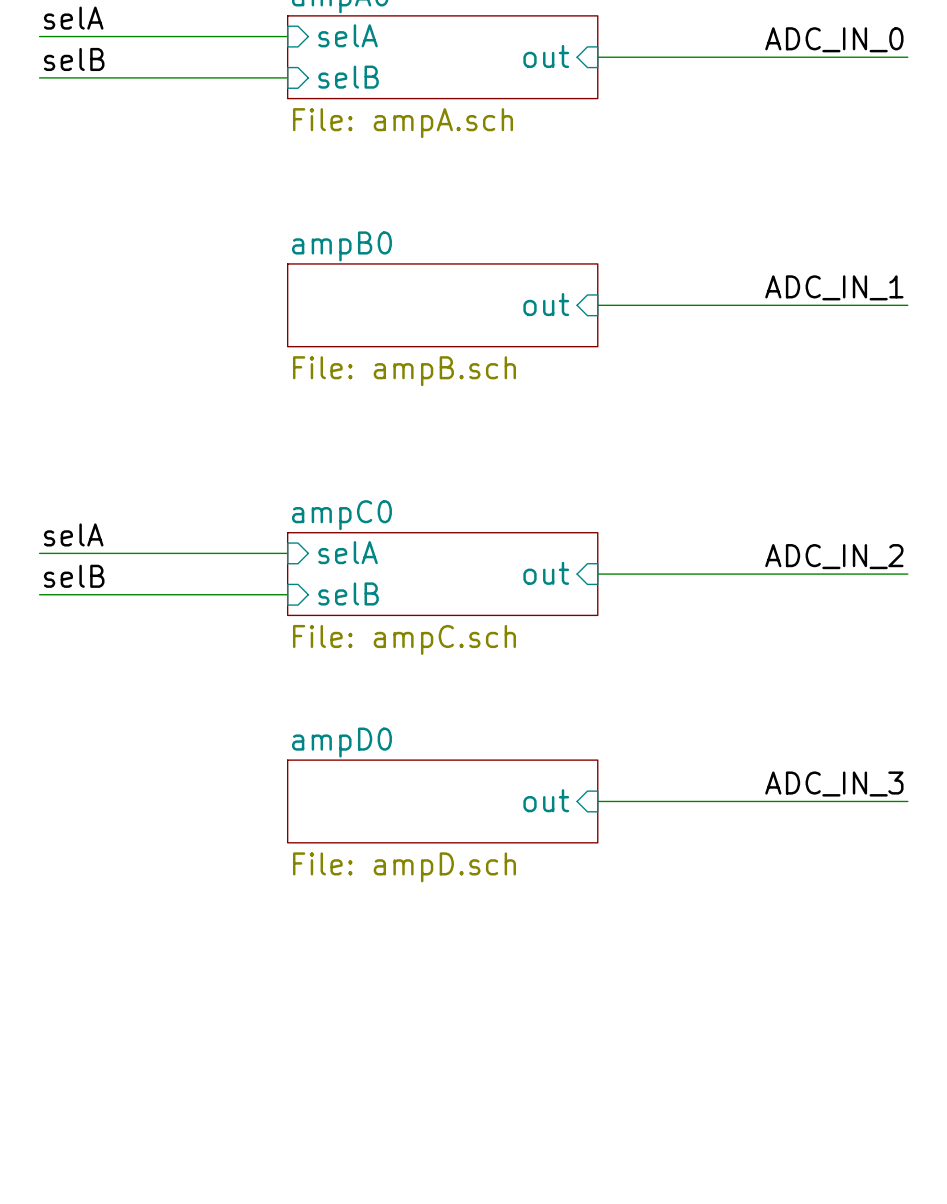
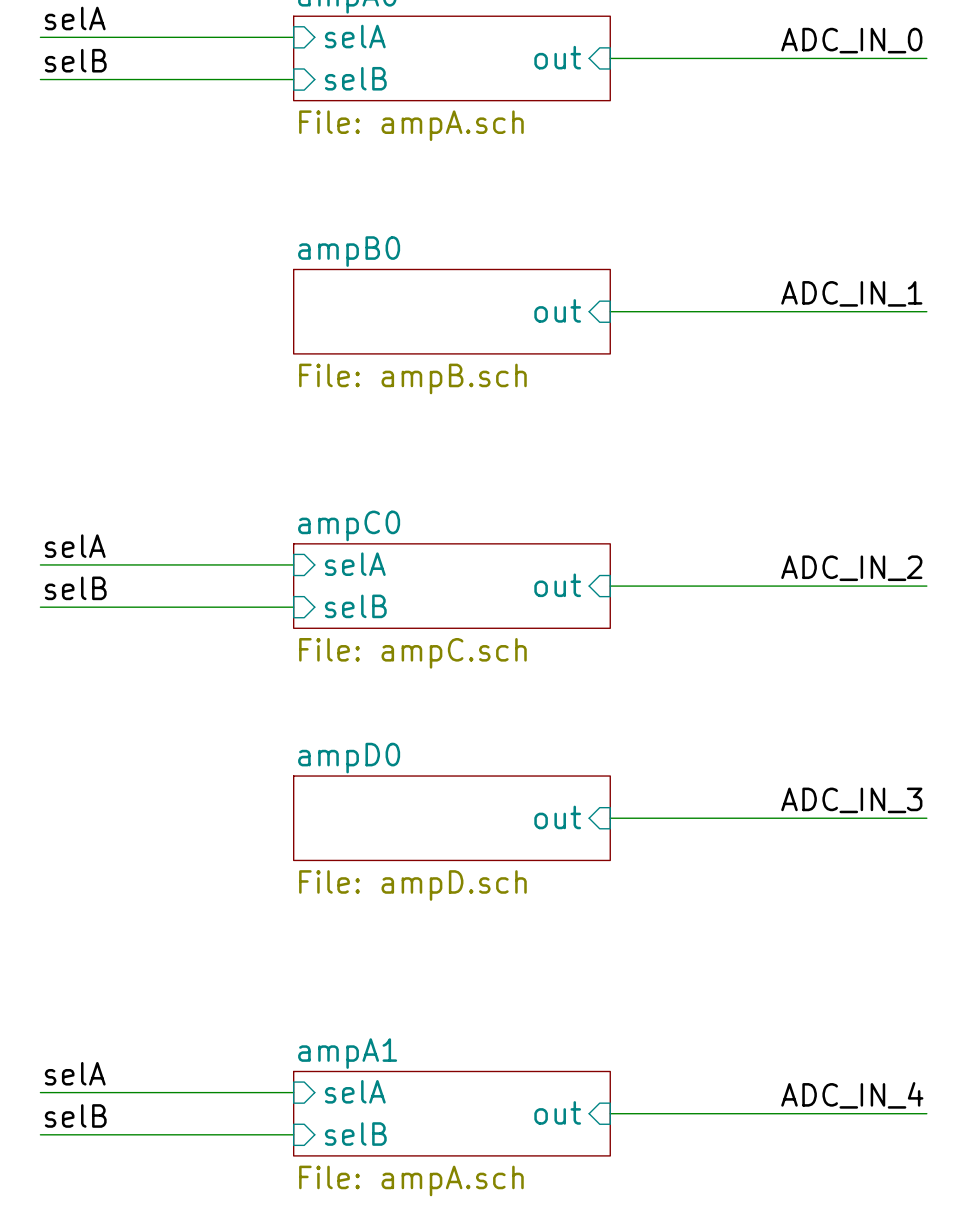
label: none -> selA (75, 1073)
sheet pin: none -> selA (355, 1091)
wire: none -> (40, 1092) (293, 1092)
label: none -> ADC_IN_4 (852, 1095)
sheet ampA1: none -> File: ampA.sch (451, 1113)
sheet pin: none -> out (557, 1112)
wire: none -> (610, 1113) (926, 1113)
label: none -> selB (75, 1115)
sheet pin: none -> selB (355, 1134)
wire: none -> (40, 1134) (293, 1134)

